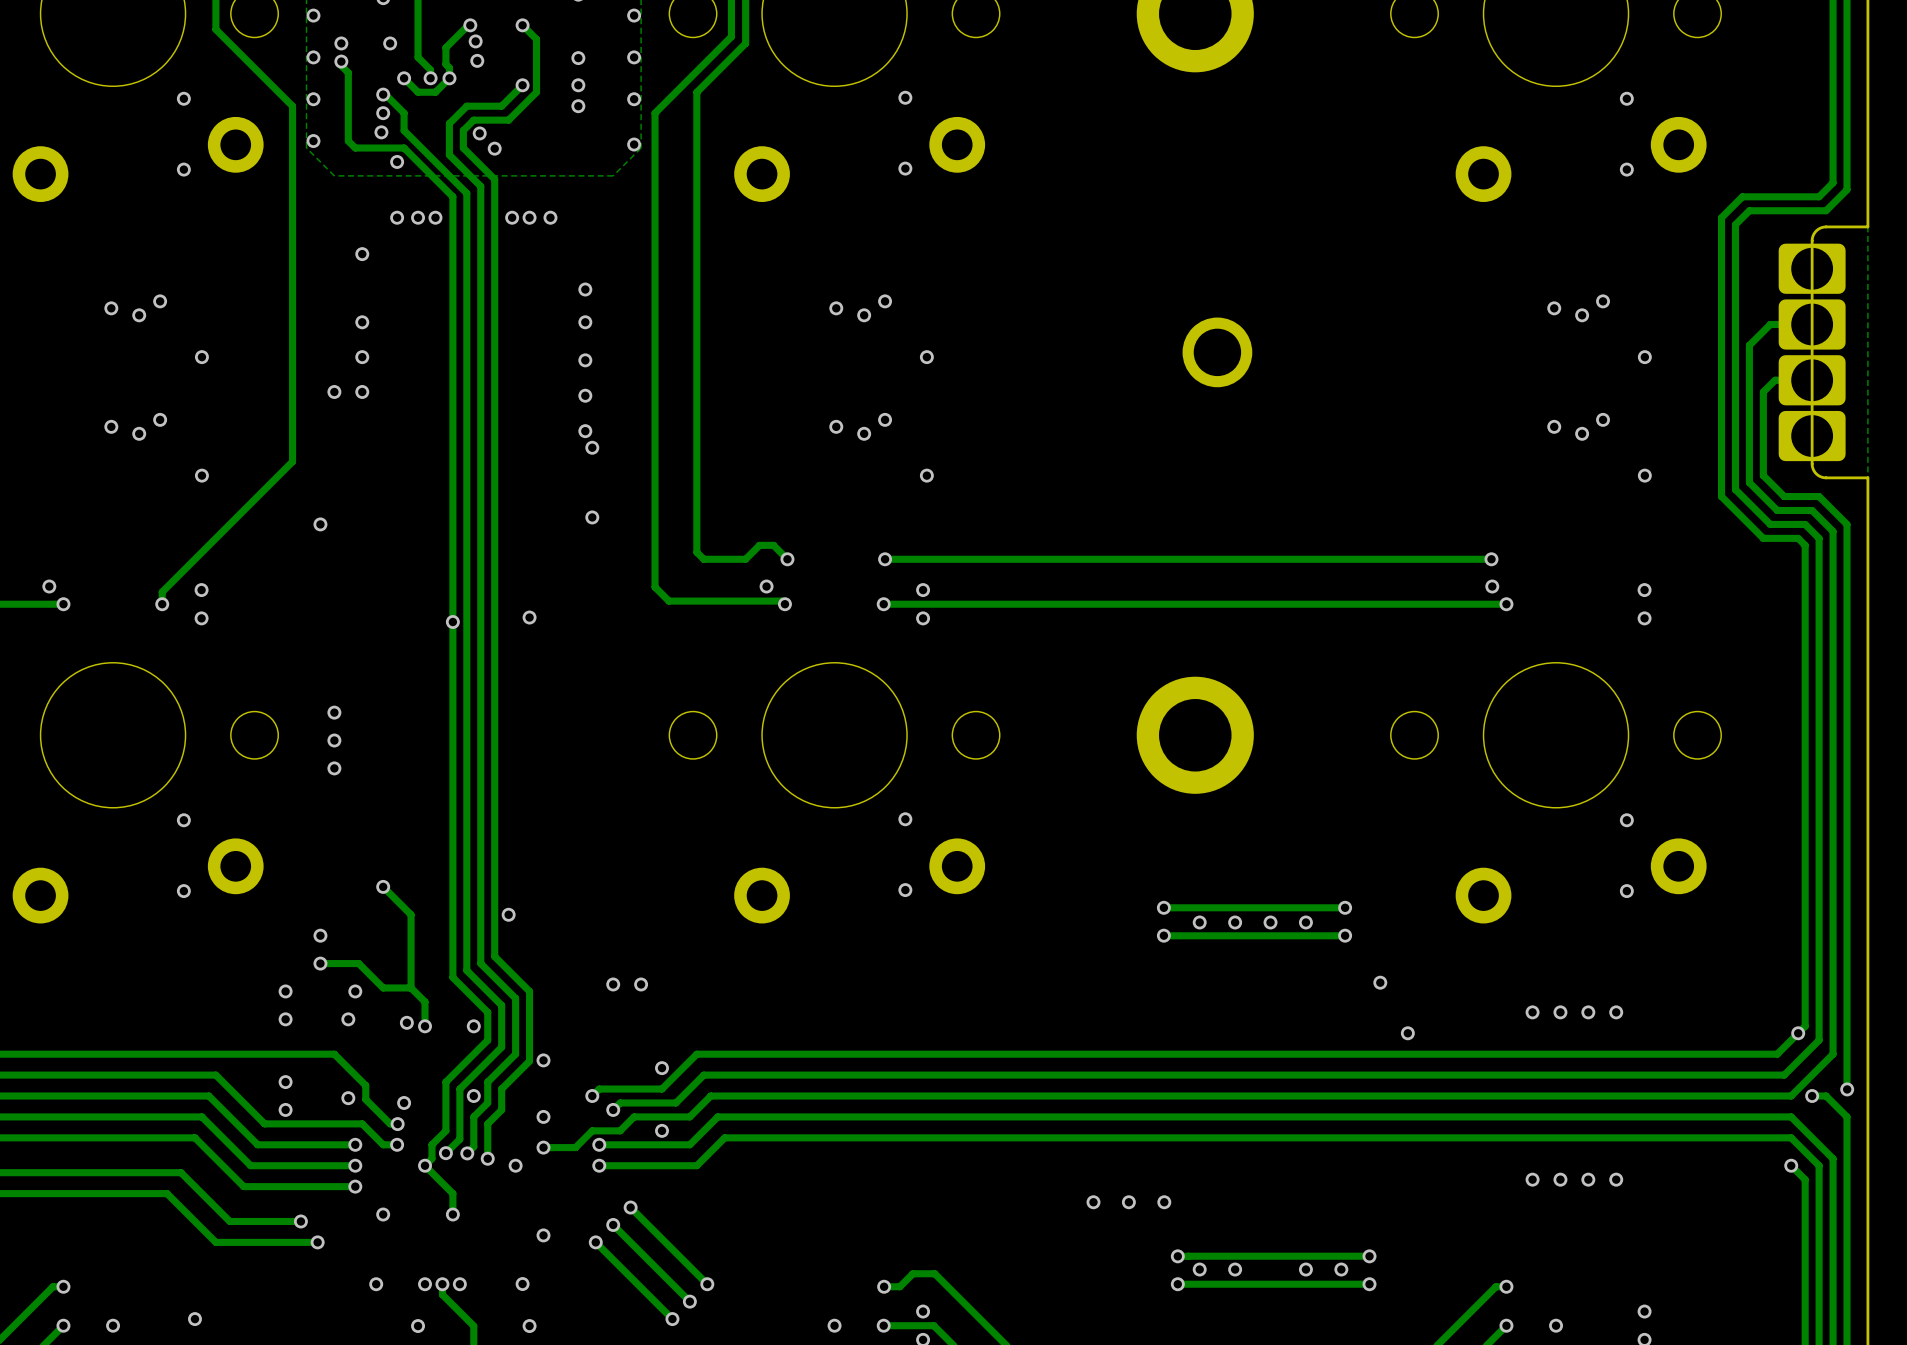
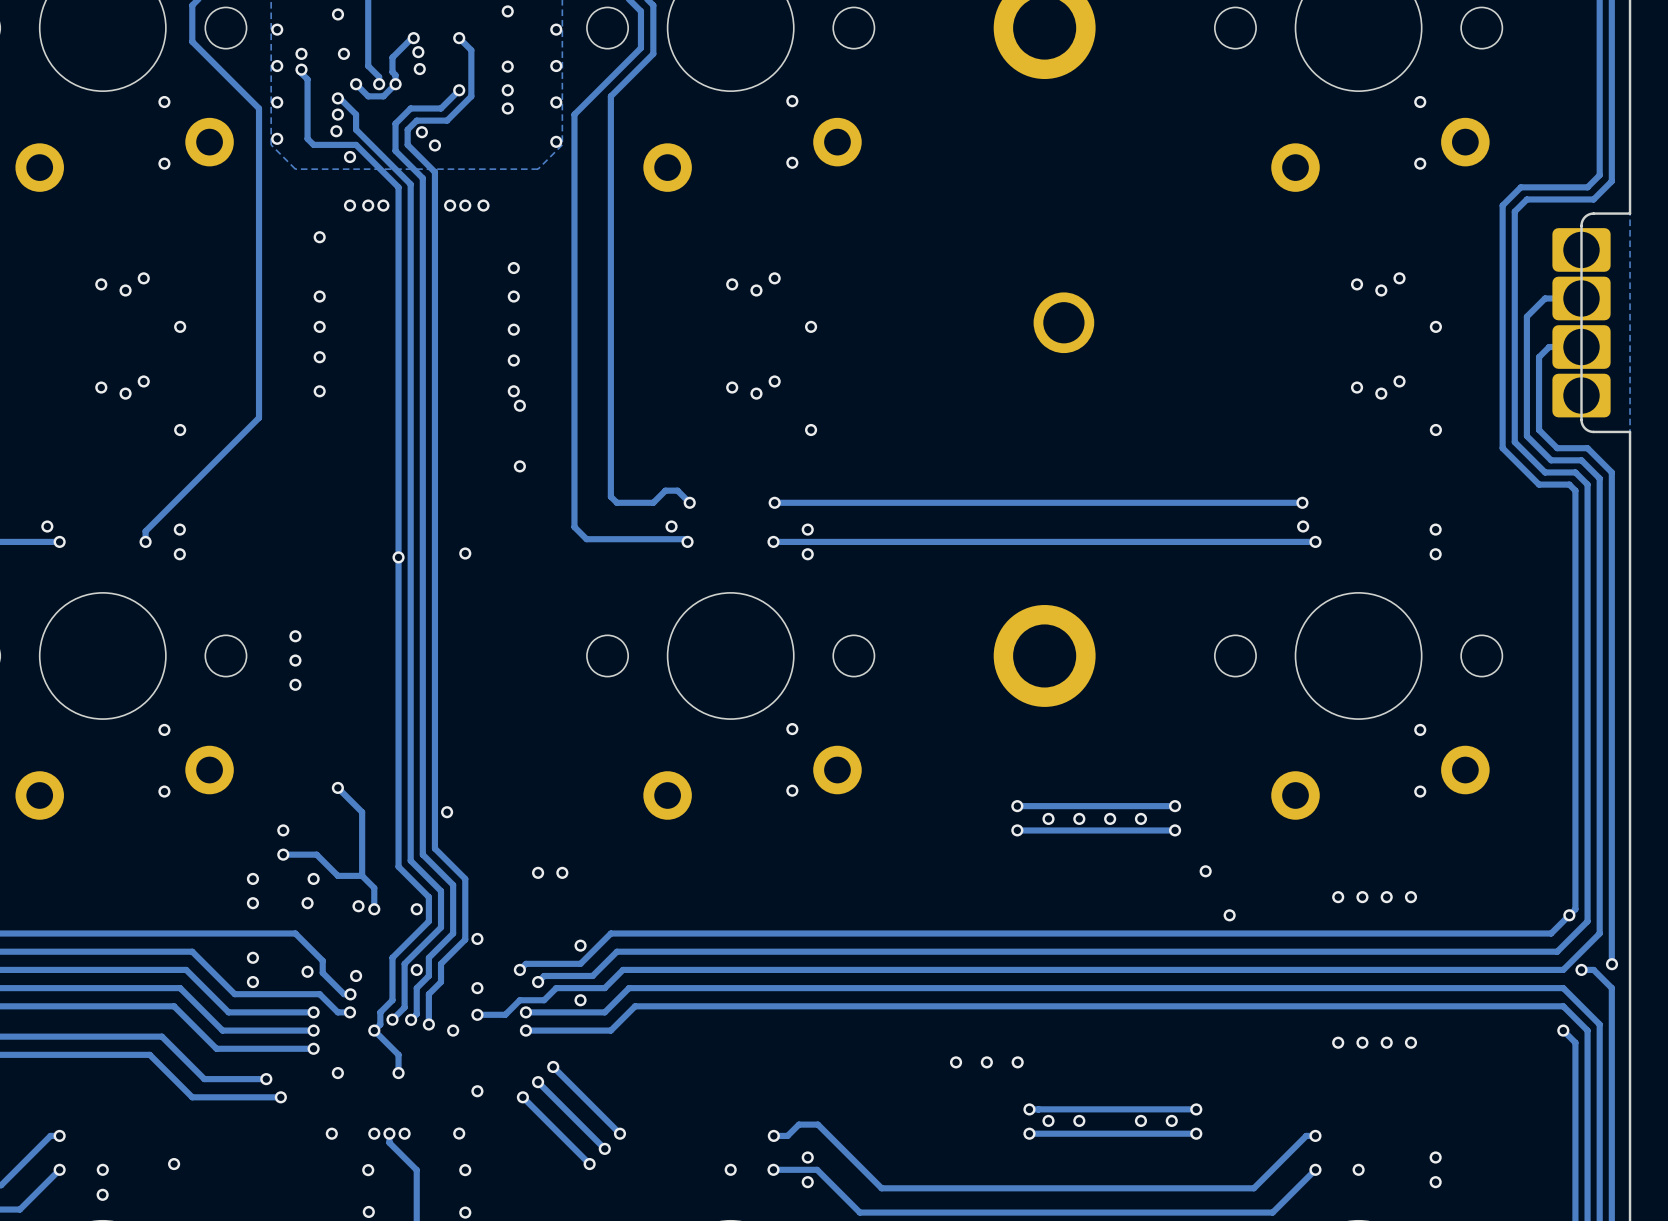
via position: (334, 391) -> (319, 391)
via: (320, 524) -> none

